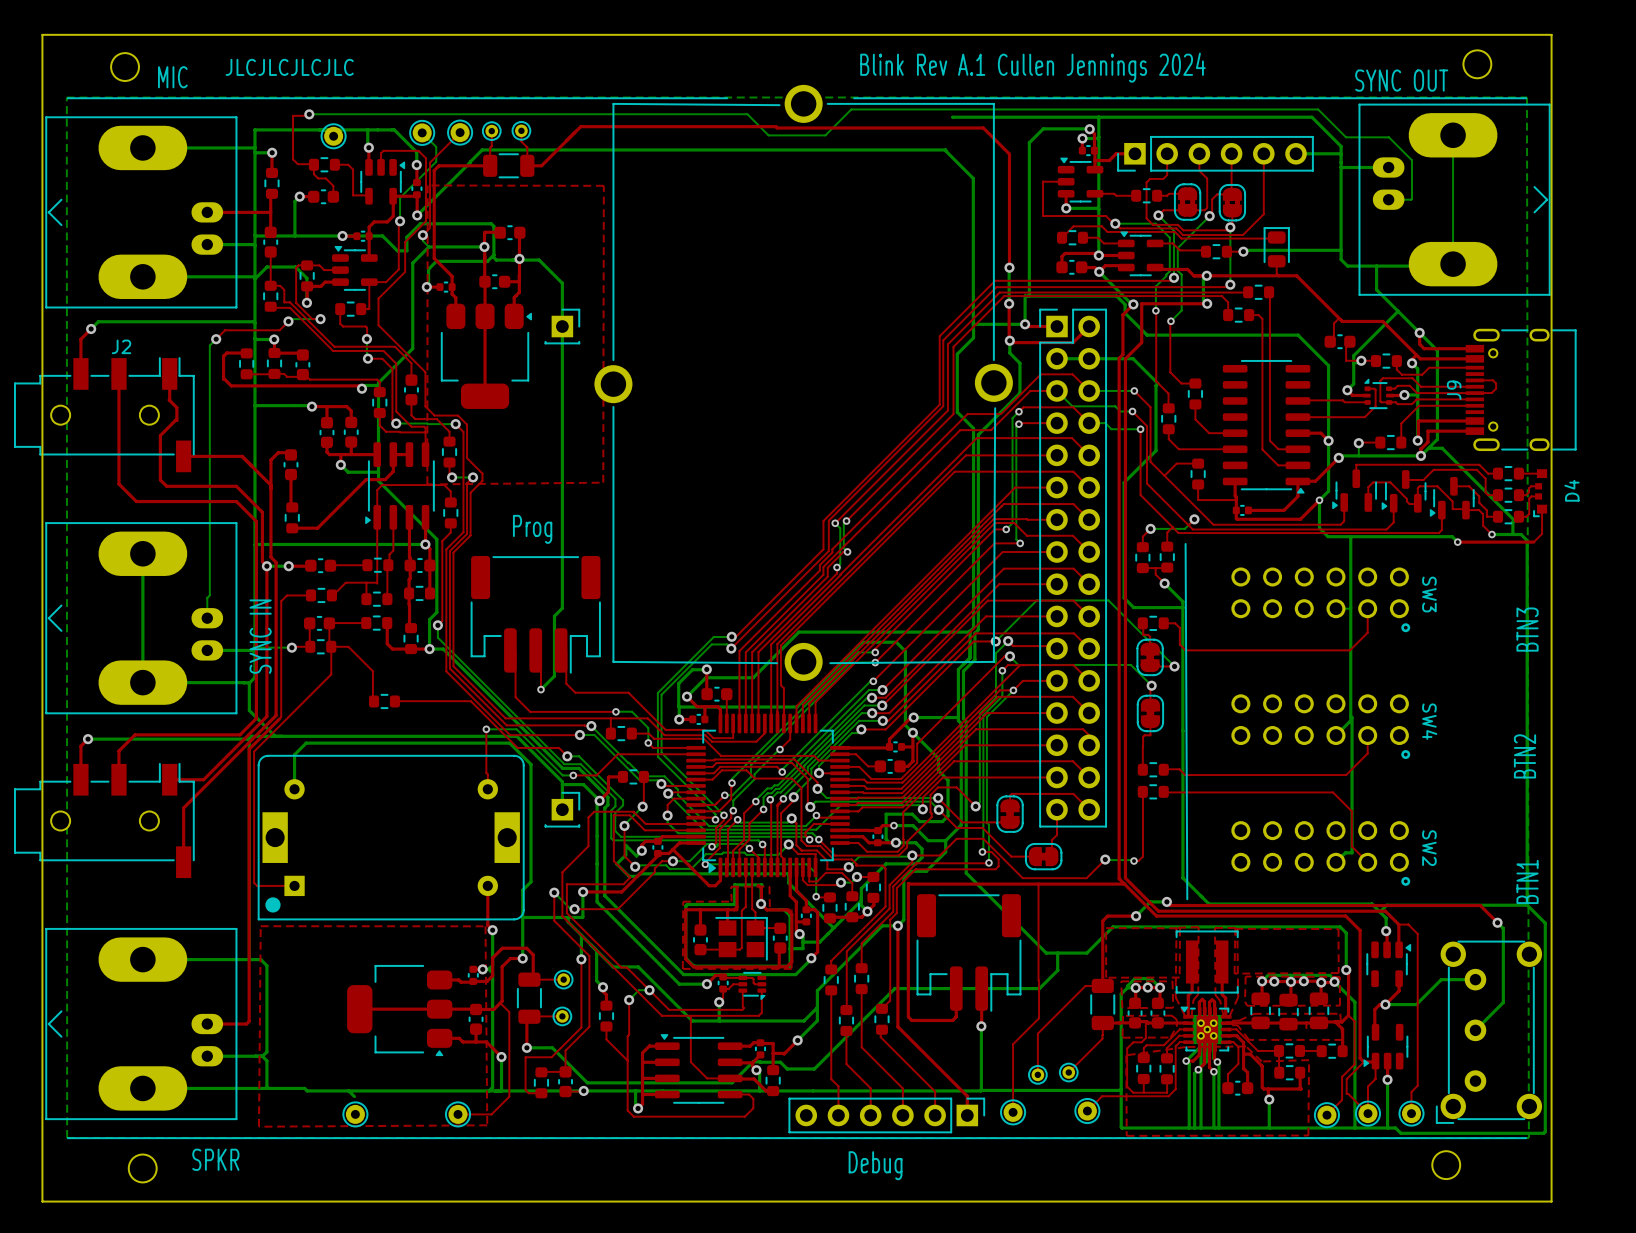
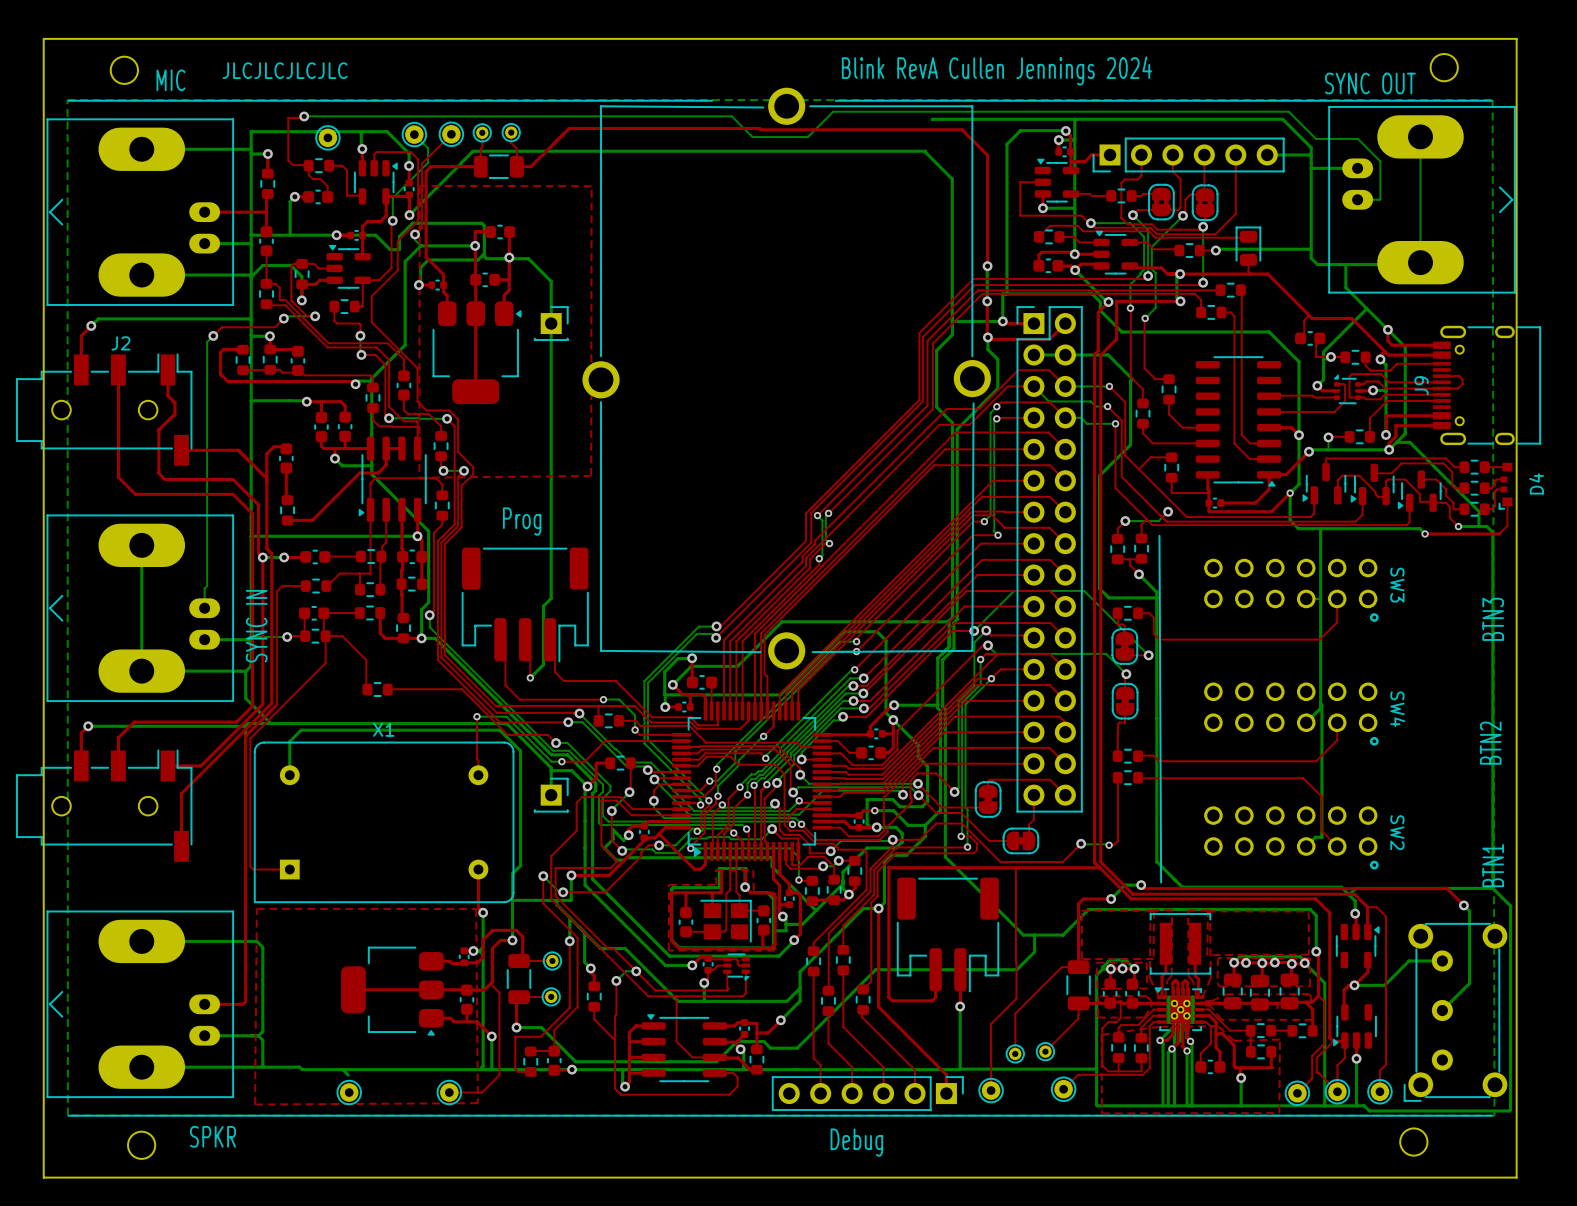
text: Blink Rev A.1 Cullen Jennings 2024 (1032, 67) -> Blink RevA Cullen Jennings 2024 (996, 70)
part: (391, 837) -> none
X1: none -> (384, 822)

